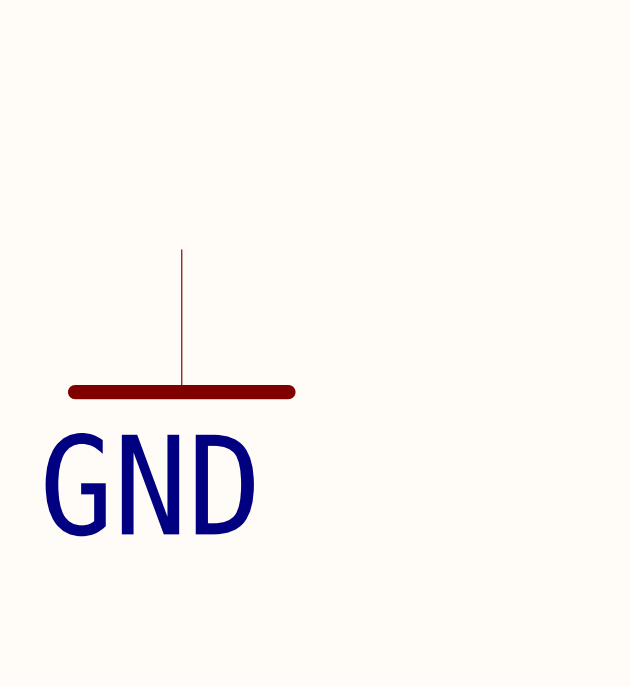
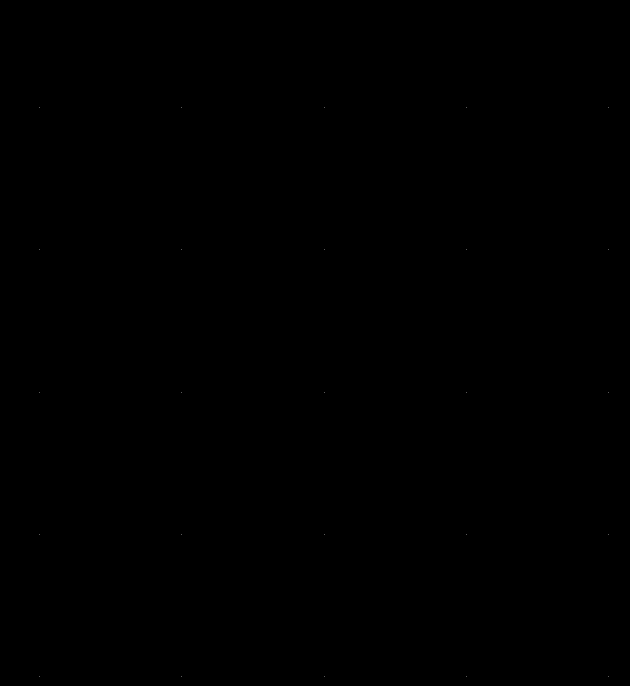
power symbol: GND (181, 324) -> none

